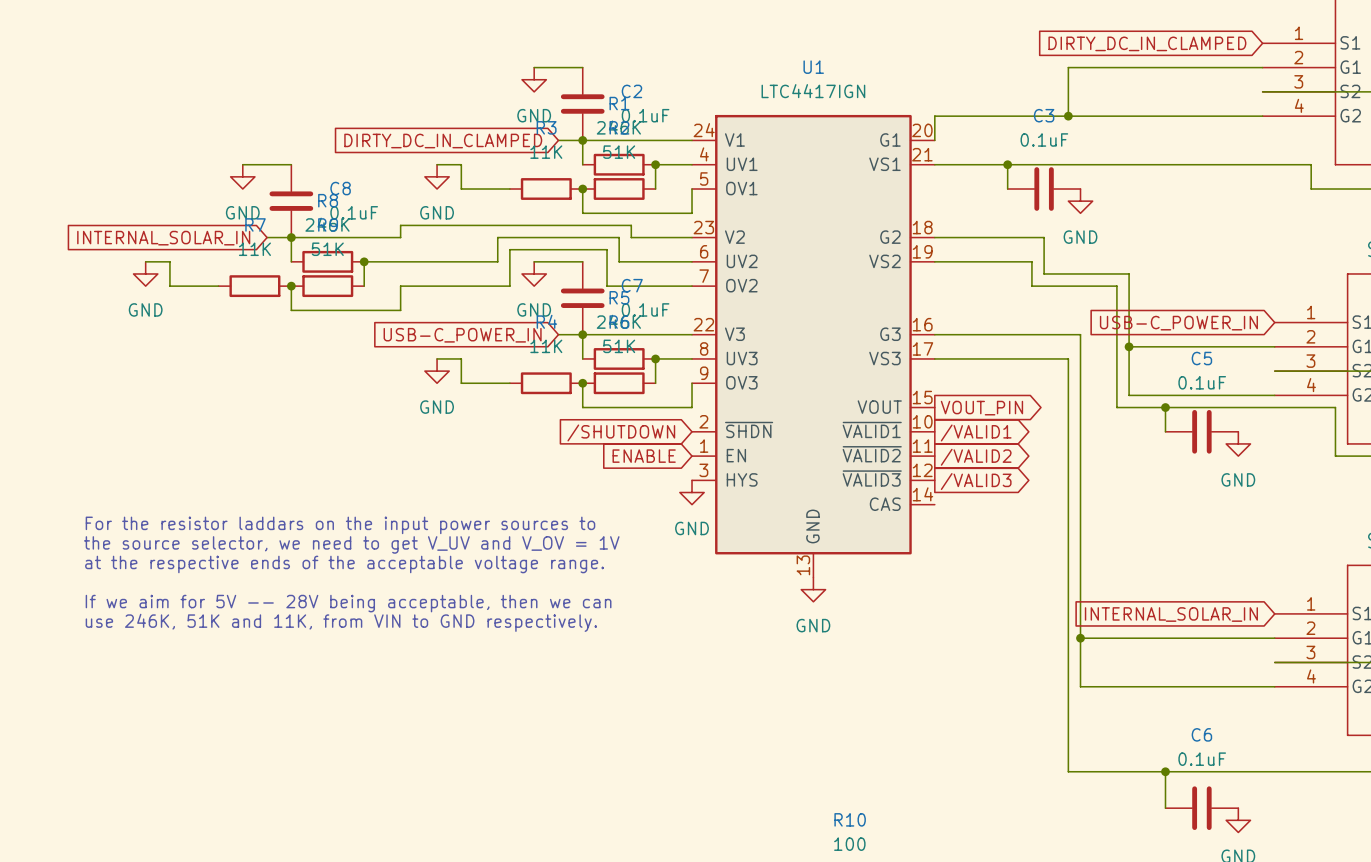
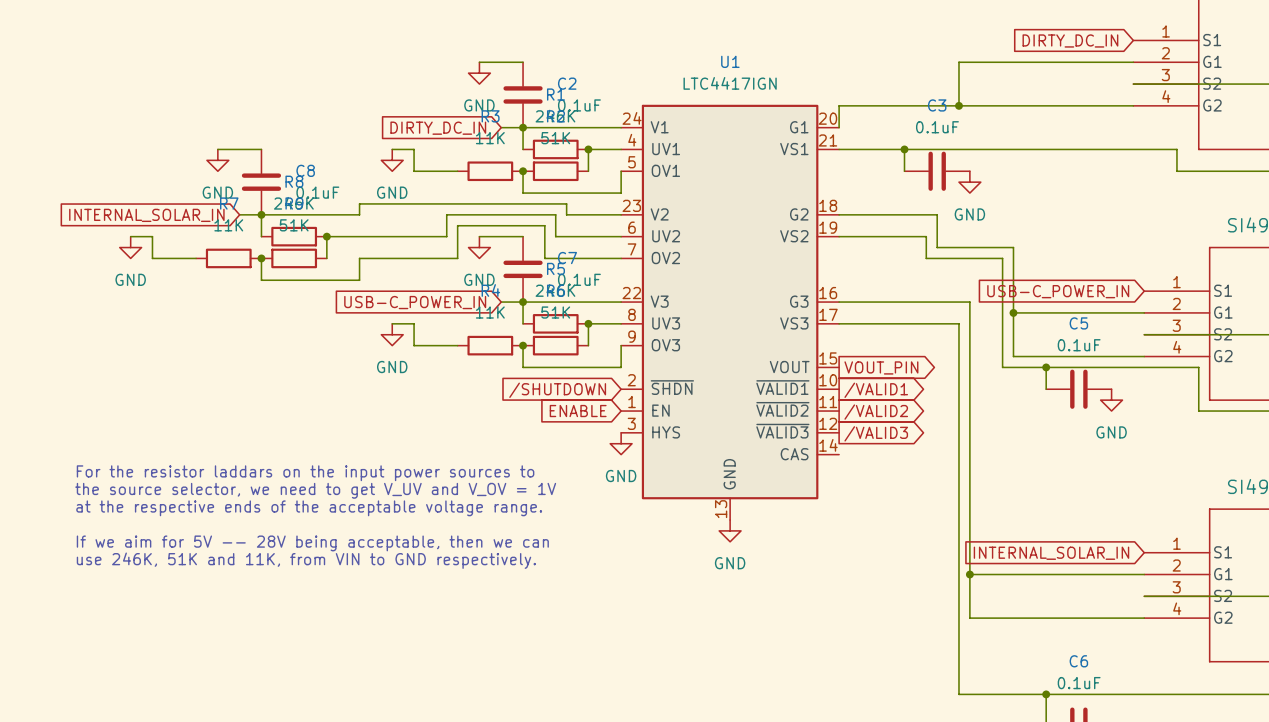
global label: DIRTY_DC_IN_CLAMPED (1147, 43) -> DIRTY_DC_IN (1070, 40)
global label: DIRTY_DC_IN_CLAMPED (443, 141) -> DIRTY_DC_IN (438, 128)

